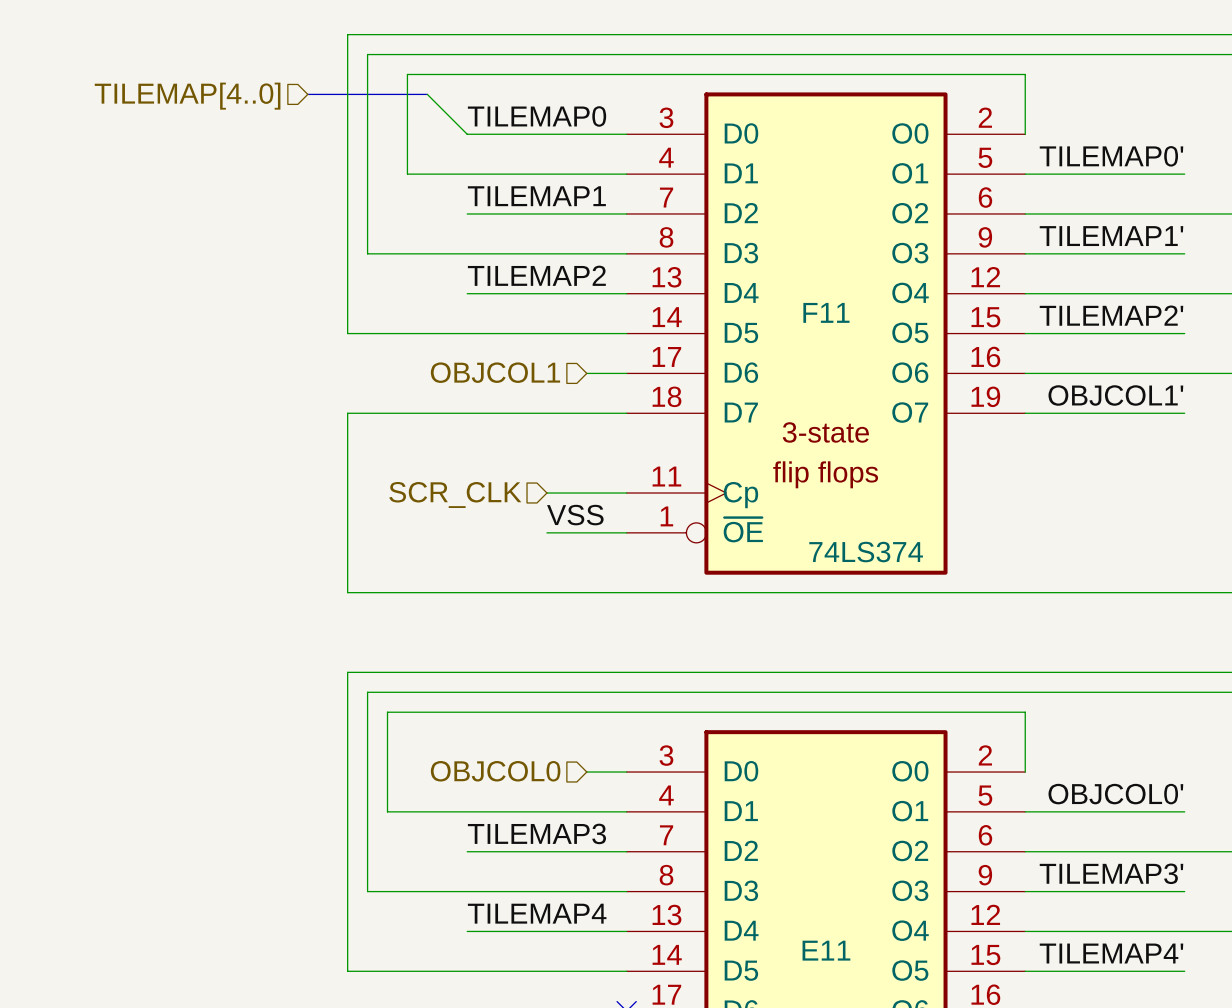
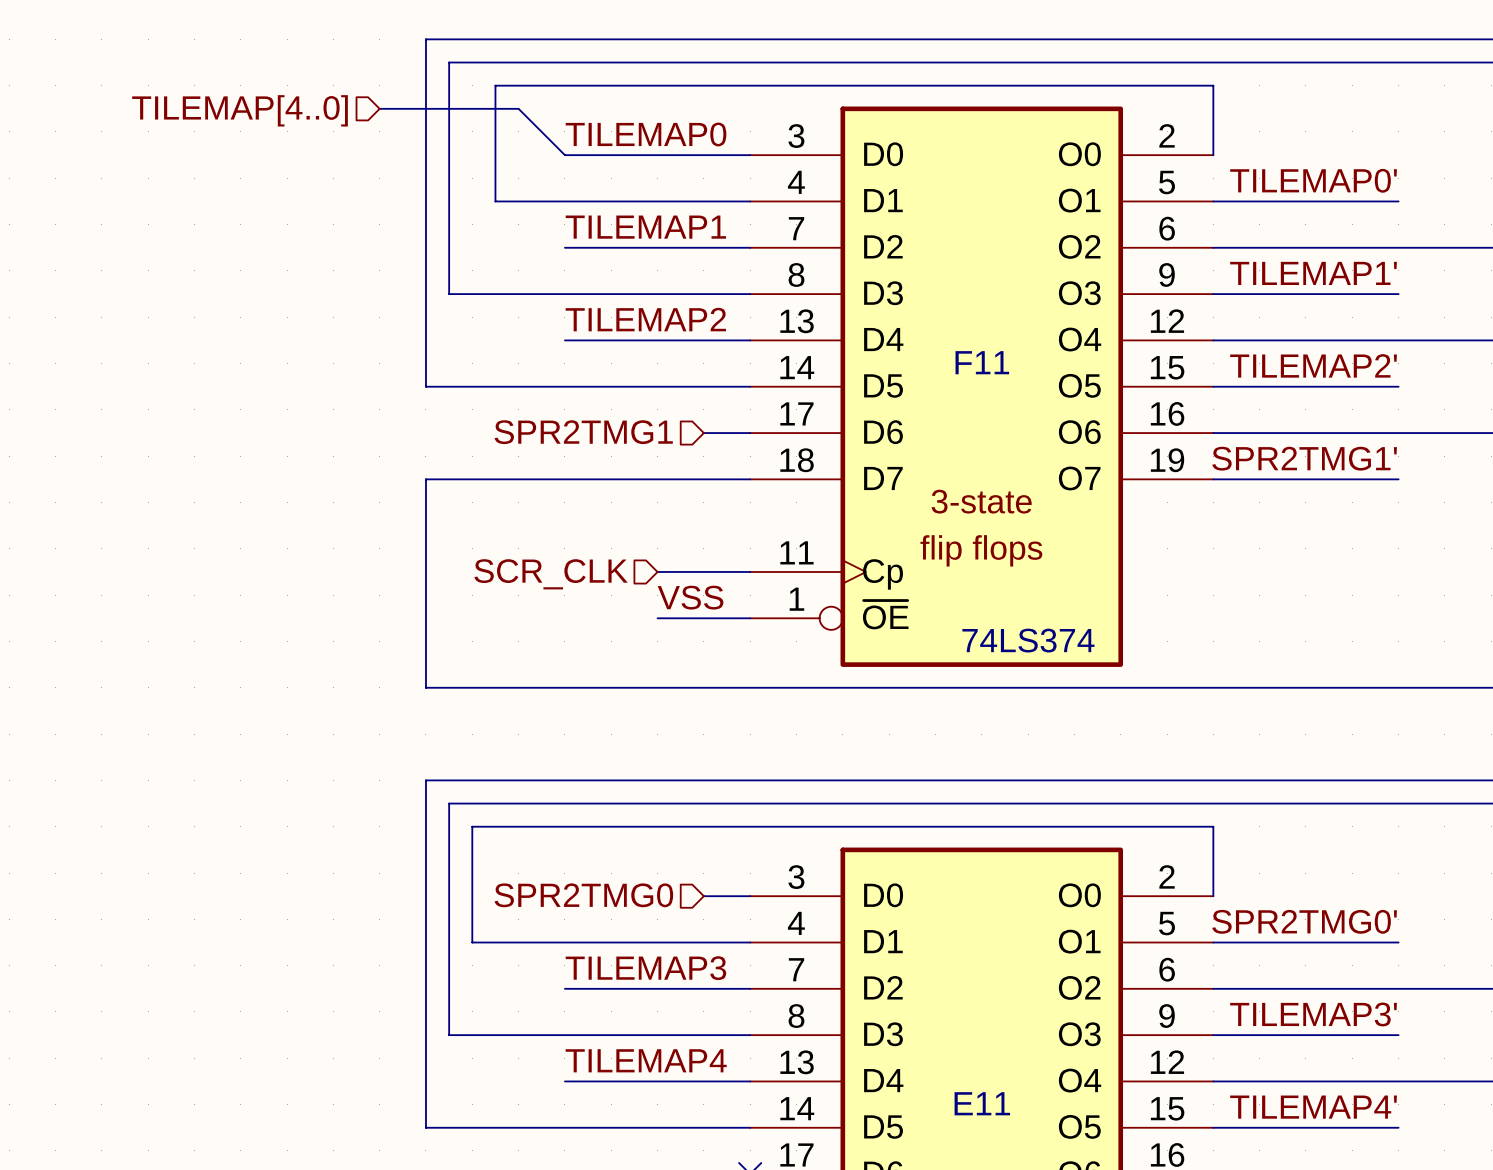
hierarchical label: OBJCOL1 (495, 372) -> SPR2TMG1 (583, 432)
label: OBJCOL1' (1115, 395) -> SPR2TMG1' (1304, 458)
hierarchical label: OBJCOL0 (495, 771) -> SPR2TMG0 (583, 895)
label: OBJCOL0' (1115, 794) -> SPR2TMG0' (1304, 921)

